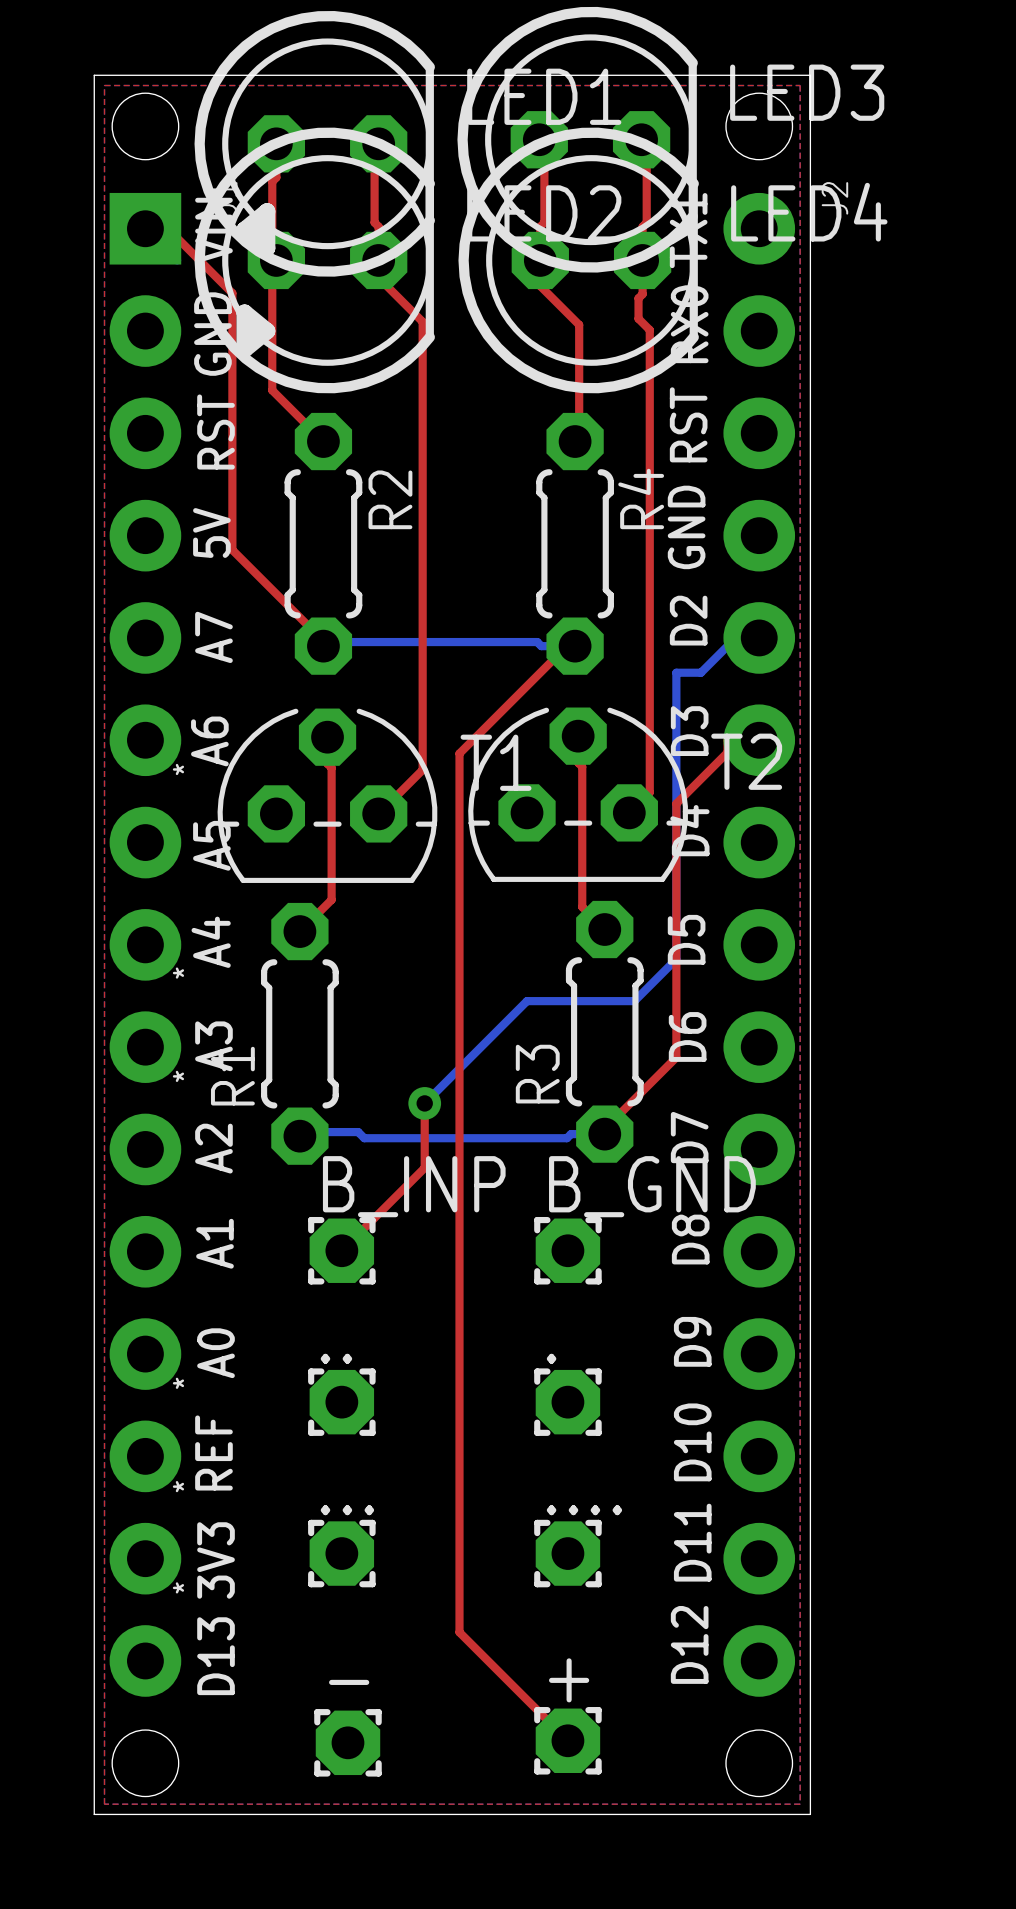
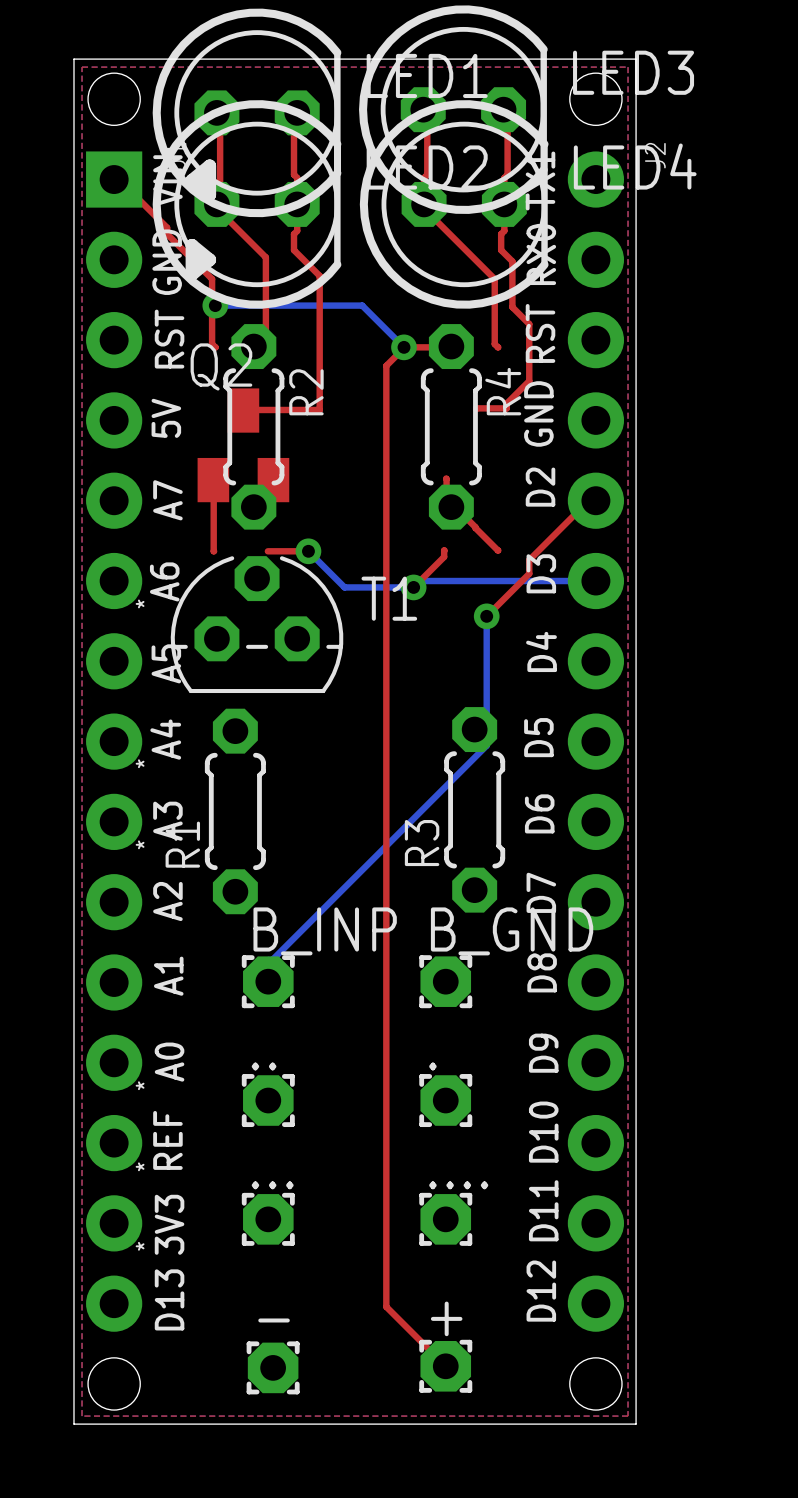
top track: (276, 143) (276, 177) (272, 181) (272, 256) (276, 260) (272, 261) (272, 390) (323, 441) -> (216, 112) (220, 116) (220, 207) (216, 204) (216, 208) (265, 257) (265, 344) (269, 347)
top track: (151, 228) (176, 228) (176, 236) (232, 293) (232, 549) (323, 641) (323, 646) -> (118, 179) (167, 227) (167, 234) (212, 279) (212, 344) (215, 347)
top track: (540, 265) (540, 286) (579, 324) (579, 437) (575, 441) -> (424, 208) (494, 279) (494, 344) (497, 347)
top track: (378, 277) (422, 321) (422, 769) (378, 813) -> (297, 218) (297, 230) (294, 234) (294, 250) (319, 275) (319, 409) (243, 409)
top track: (649, 330) (649, 792) (629, 812) -> (509, 259) (512, 261) (512, 307) (529, 324) (529, 381) (506, 403) (506, 408) (476, 408)
bottom track: none -> (215, 305) (362, 305) (404, 347)
via: none -> (215, 305)
via: none -> (404, 347)
Q2: none -> (243, 445)
top track: none -> (446, 478) (446, 498) (497, 550)
top track: none -> (213, 480) (213, 551)
bottom track: (759, 637) (735, 637) (700, 672) (676, 672) (676, 959) (634, 1001) (527, 1001) (424, 1103) -> none
top track: none -> (595, 500) (588, 500) (529, 560) (529, 573) (486, 616)
bottom track: (323, 646) (327, 642) (537, 642) (541, 646) (575, 646) -> none
top track: (575, 646) (566, 646) (459, 753) (459, 1632) (492, 1665) -> (444, 347) (404, 347) (386, 365) (386, 1306)
top track: none -> (444, 550) (444, 556) (413, 587)
top track: none -> (267, 551) (308, 551)
bottom track: none -> (308, 551) (344, 587) (413, 587) (420, 581) (595, 581)
via: none -> (308, 551)
top track: (578, 736) (578, 762) (582, 766) (582, 907) (604, 929) -> none
top track: (327, 737) (327, 763) (331, 767) (331, 899) (299, 931) -> none
top track: (759, 740) (727, 740) (727, 752) (676, 803) (676, 1057) (604, 1129) (604, 1134) -> none
via: none -> (413, 587)
bottom track: none -> (486, 616) (486, 745) (272, 960) (268, 960) (268, 981)
via: none -> (486, 616)
T2: (578, 794) -> none
top track: (424, 1103) (424, 1167) (341, 1250) -> none
via: (424, 1103) -> none
bottom track: (604, 1134) (571, 1134) (566, 1138) (364, 1138) (358, 1132) (303, 1132) (299, 1136) -> none

